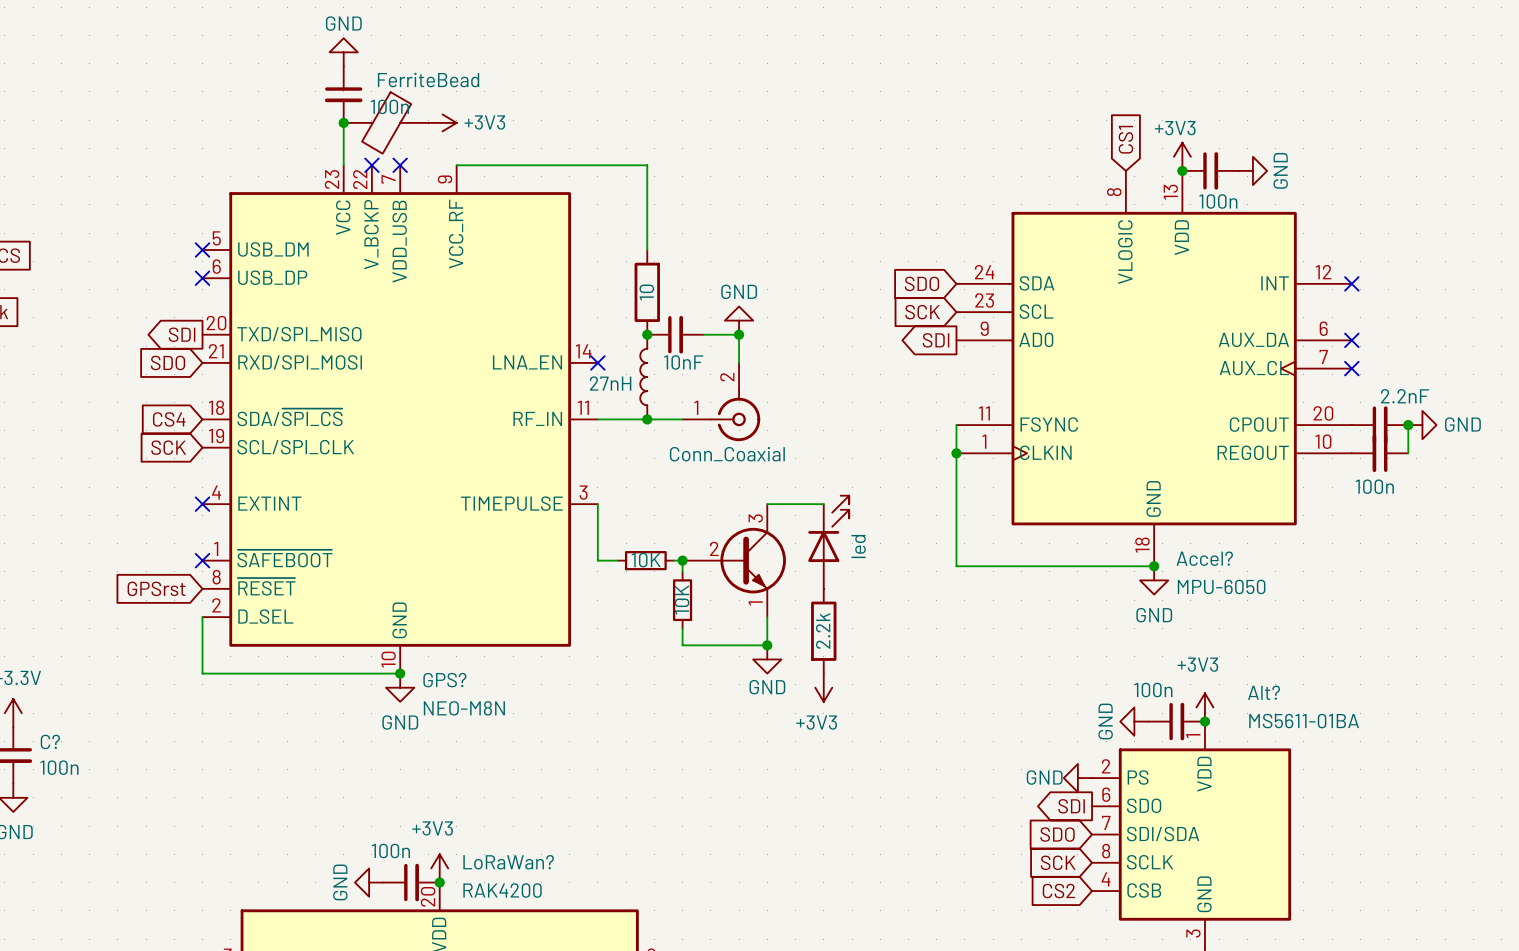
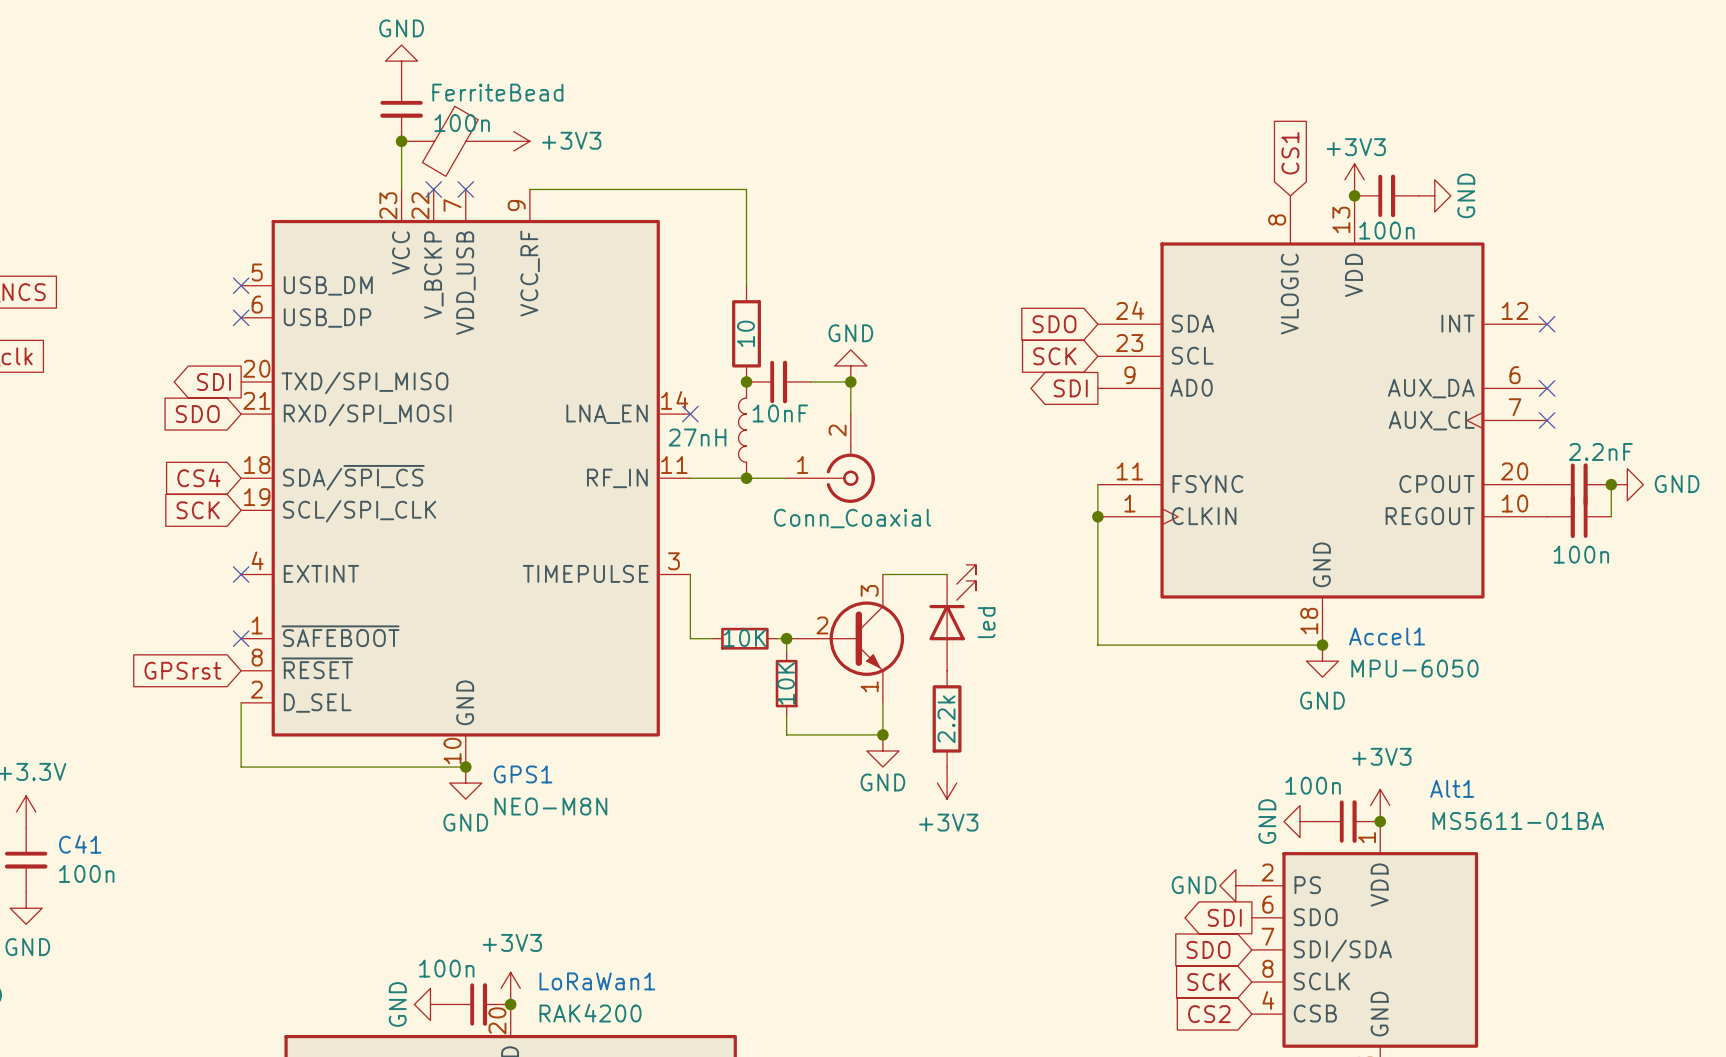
Accel? name: Accel? (1204, 558) -> Accel1 (1387, 636)
GPS? name: GPS? (444, 680) -> GPS1 (523, 774)
Alt? name: Alt? (1264, 692) -> Alt1 (1452, 788)
C? name: C? (50, 741) -> C41 (80, 844)
LoRaWan? name: LoRaWan? (508, 862) -> LoRaWan1 (597, 981)

